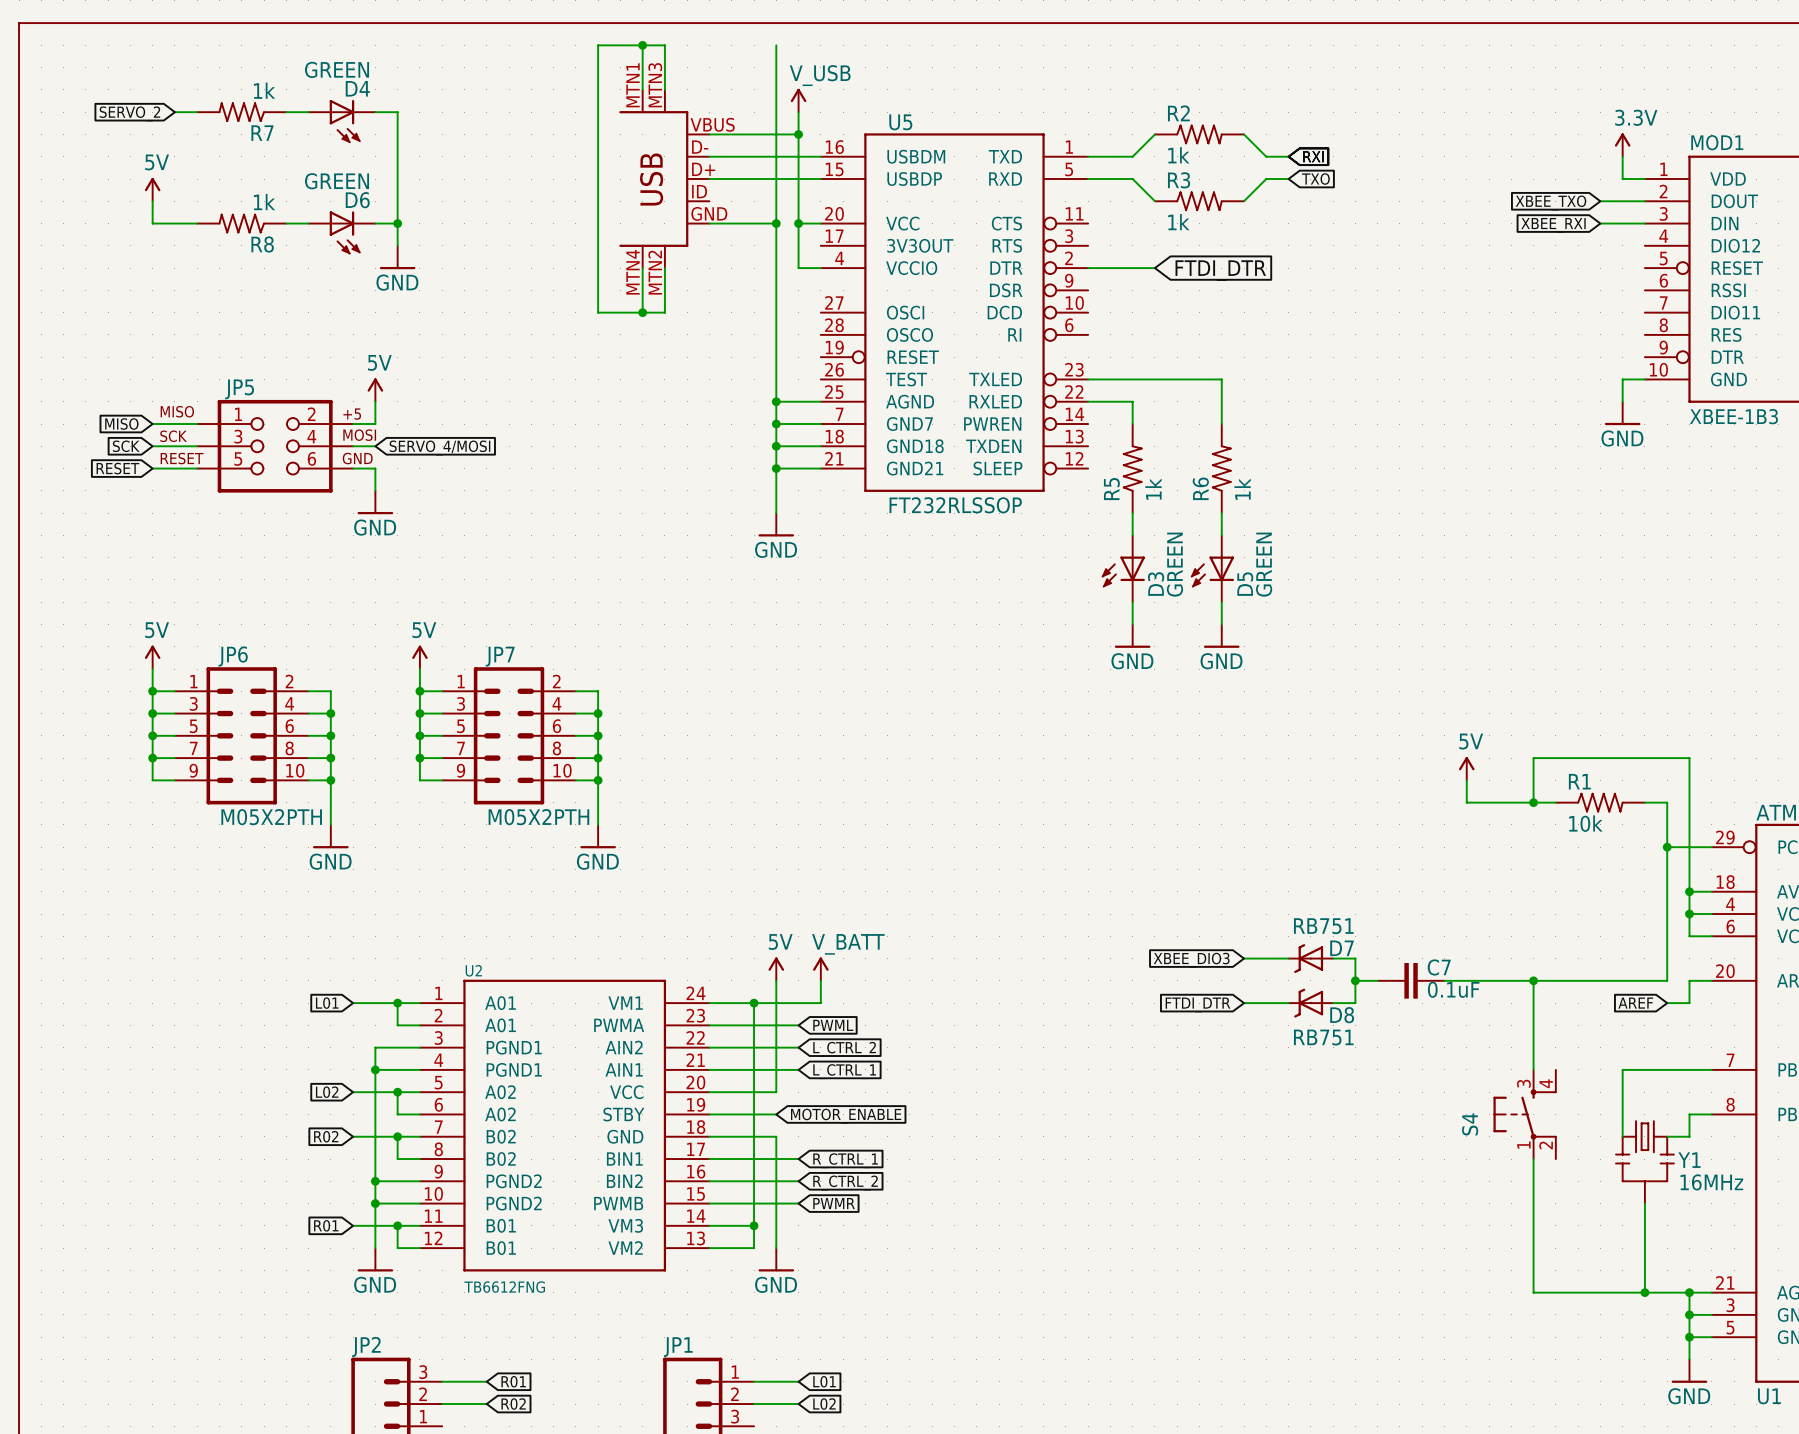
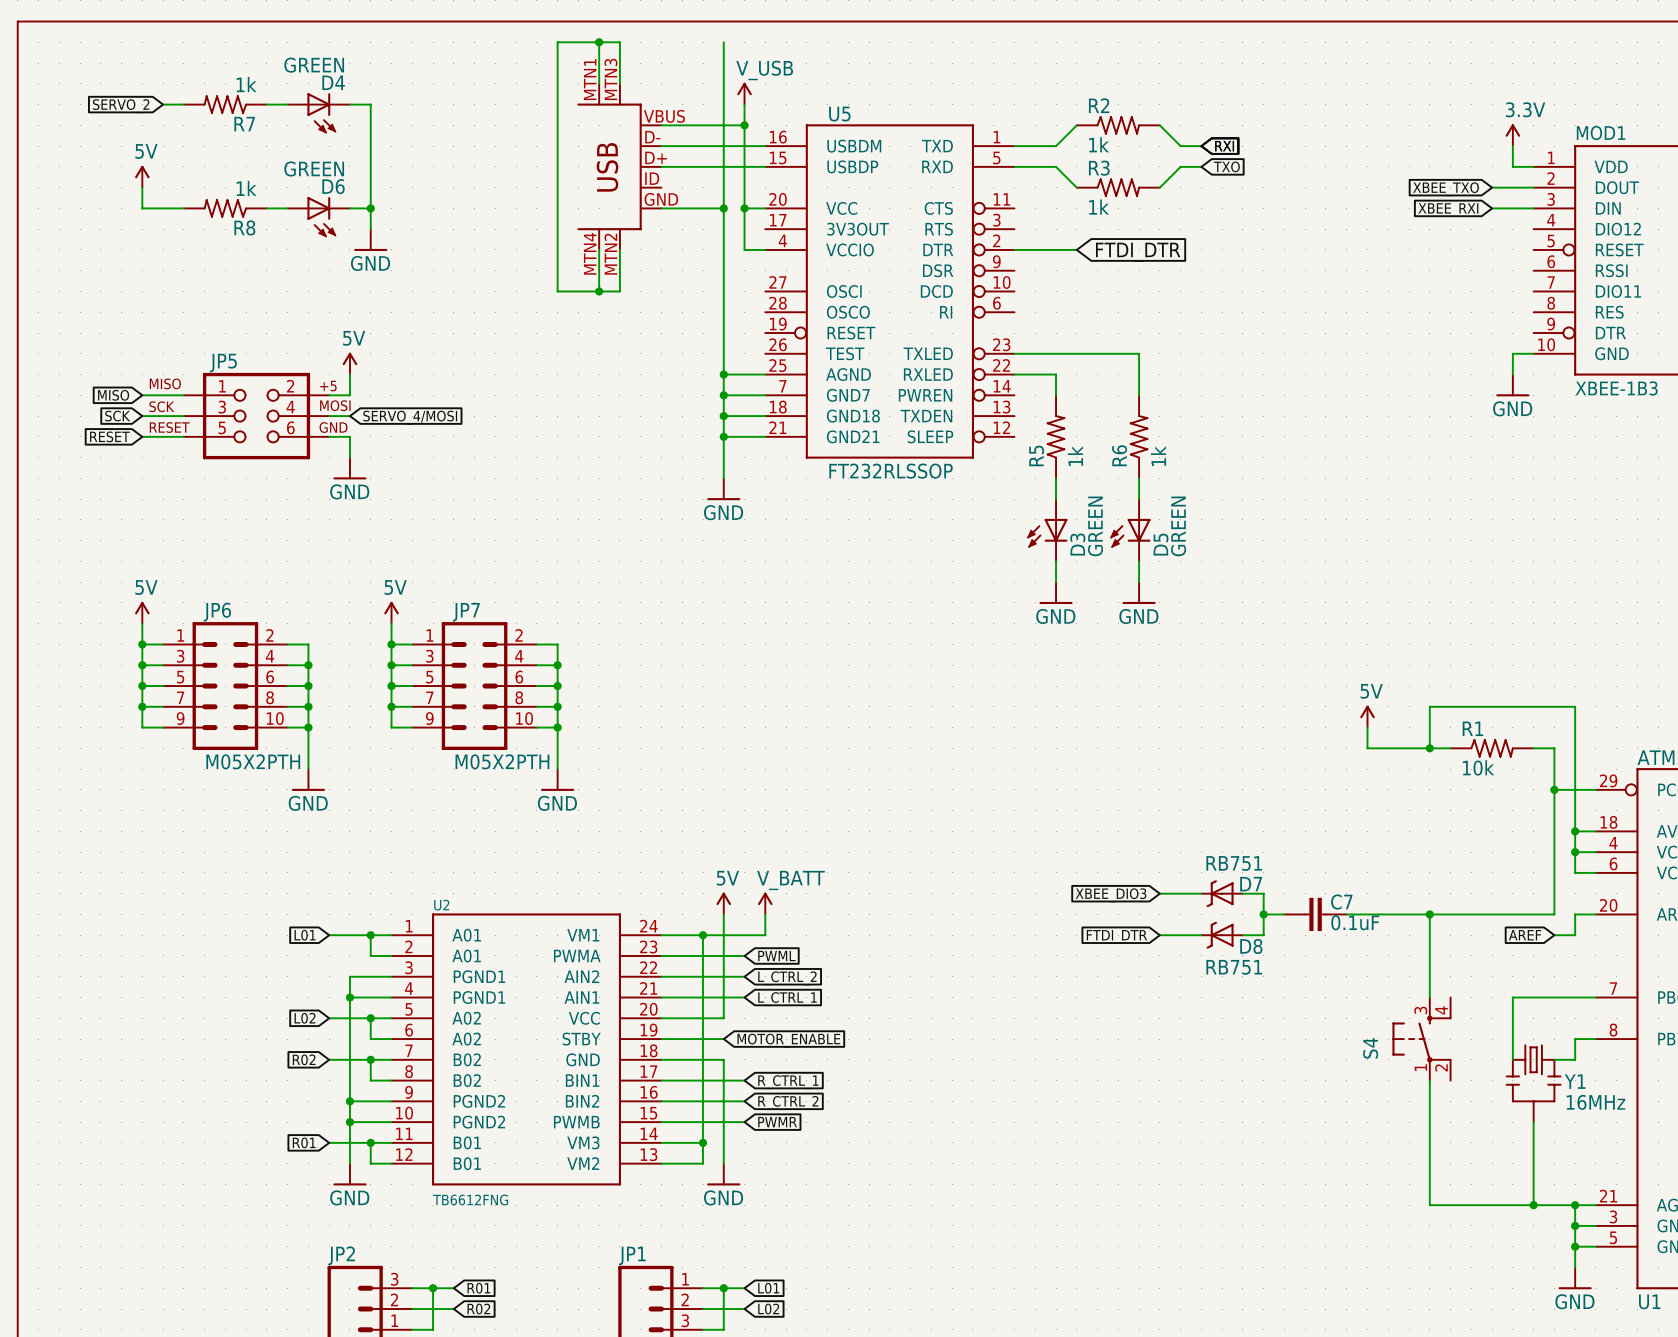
wire: none -> (433, 1288) (433, 1329) (412, 1329)
junction: none -> (433, 1288)
wire: none -> (723, 1288) (723, 1329) (703, 1329)
junction: none -> (723, 1288)

